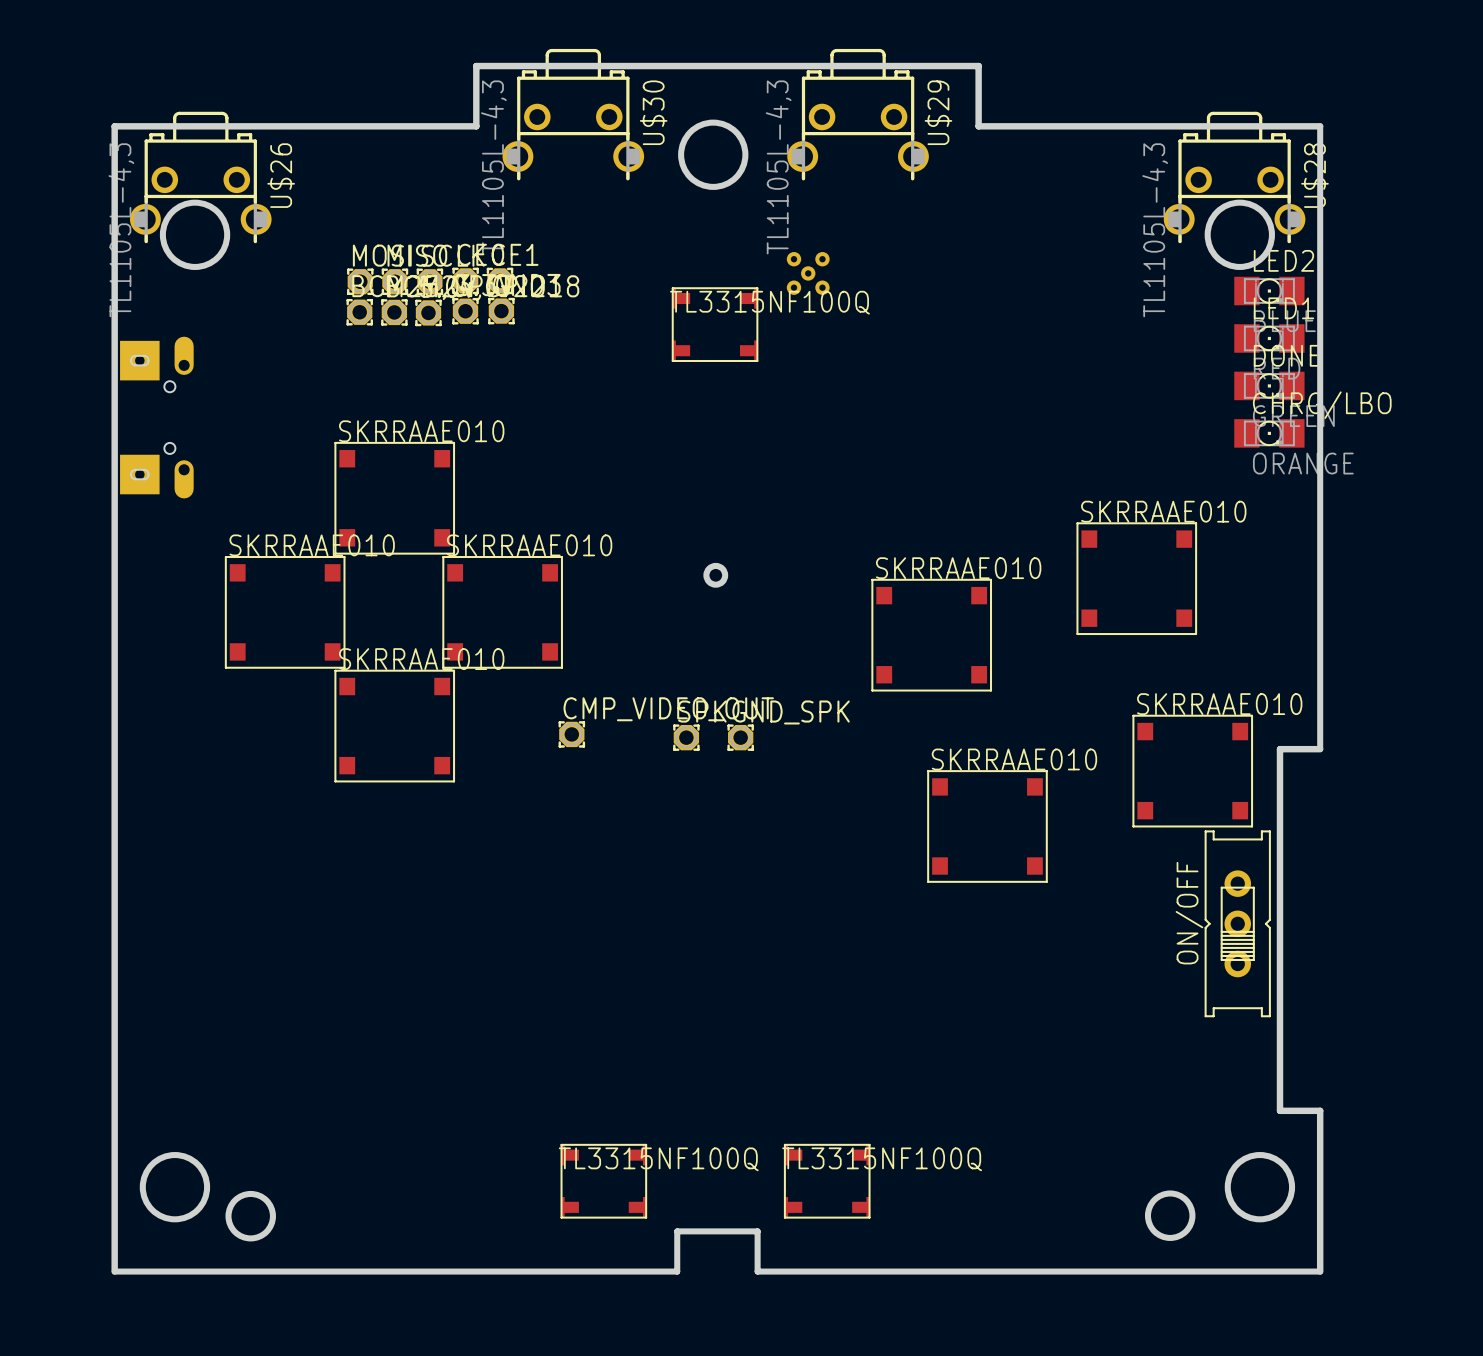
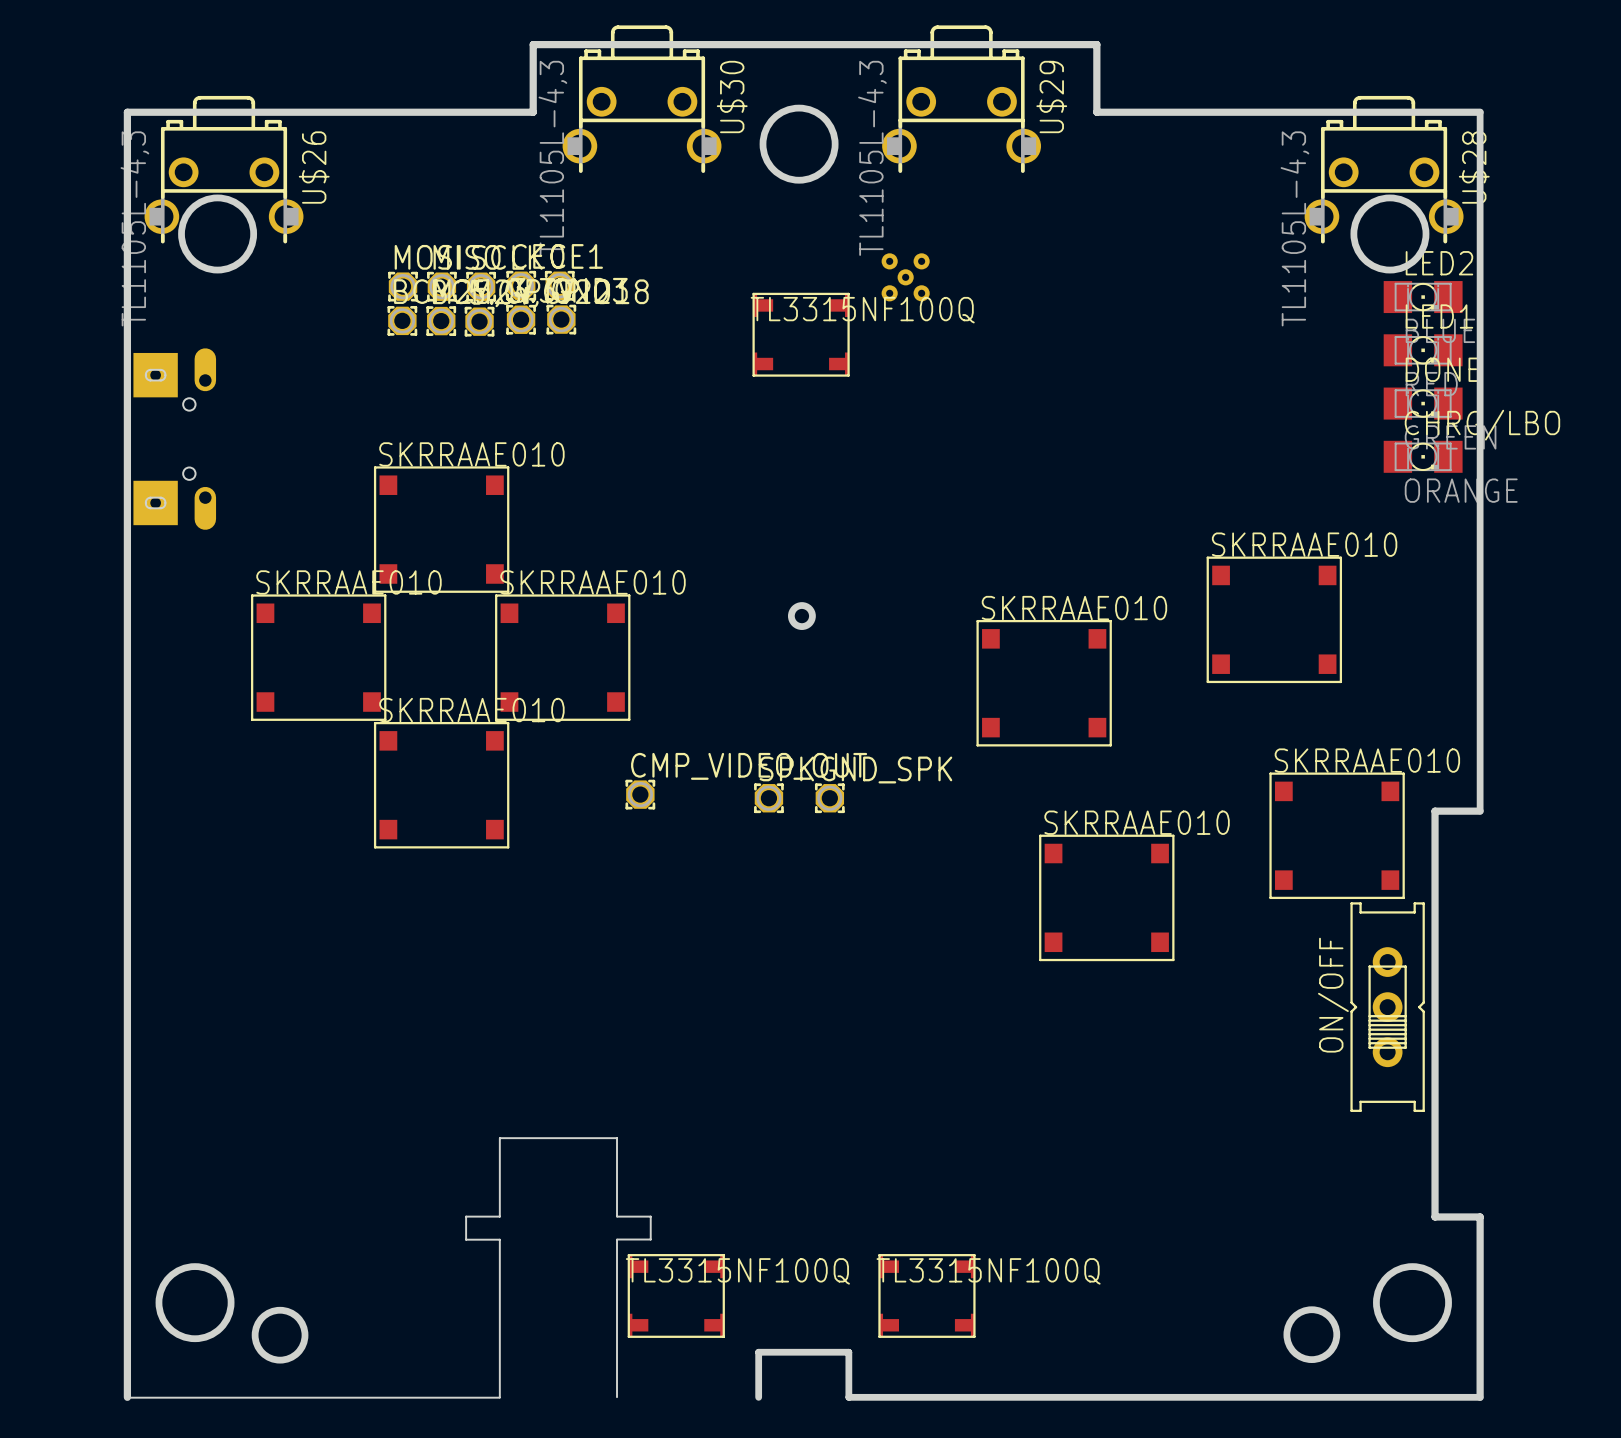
board edge: none -> (500, 1138) (617, 1138) (617, 1216)
board edge: none -> (499, 1138) (499, 1216) (466, 1216) (466, 1239) (499, 1239) (499, 1397)
board edge: none -> (617, 1216) (650, 1216) (650, 1239) (617, 1239)
board edge: none -> (617, 1239) (617, 1397)
board edge: (114, 1271) (677, 1271) -> (127, 1397) (499, 1397)

